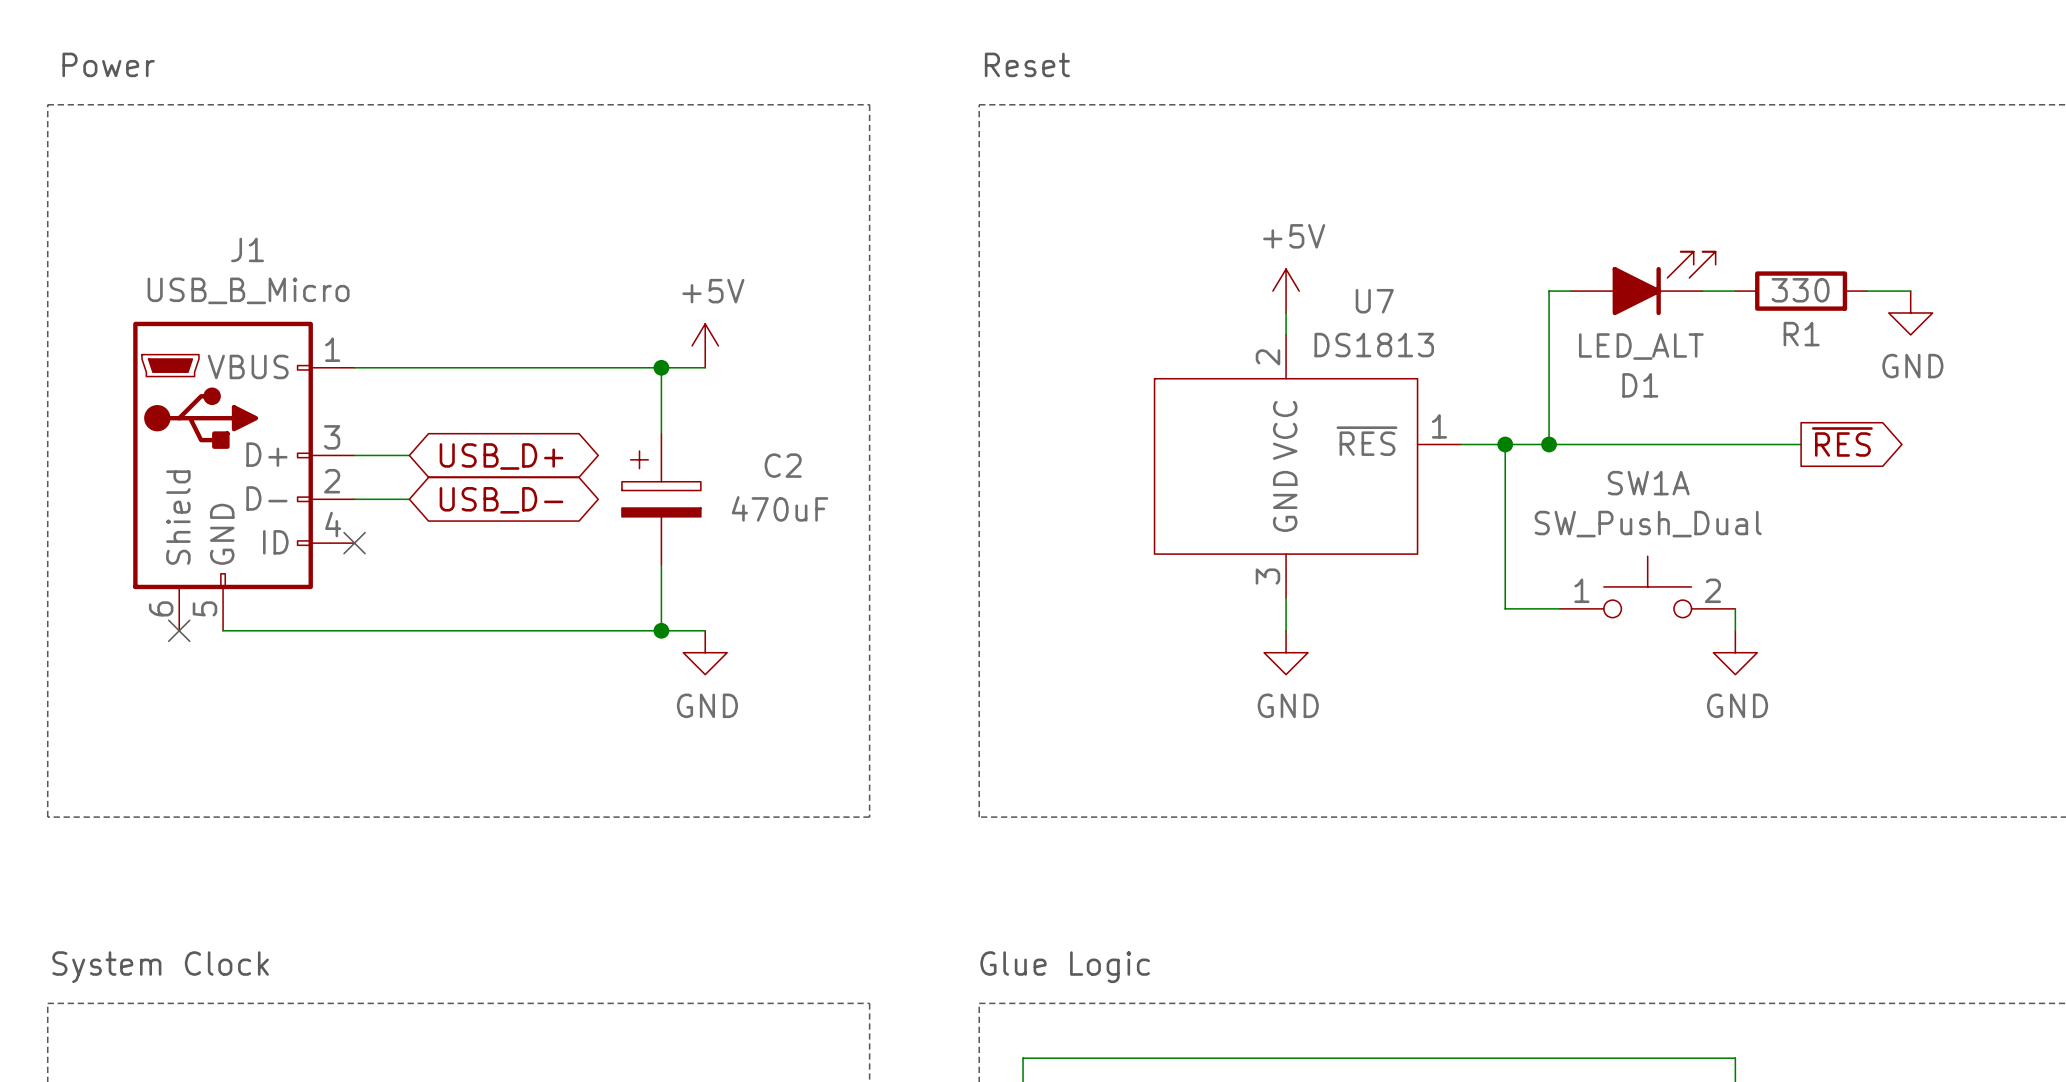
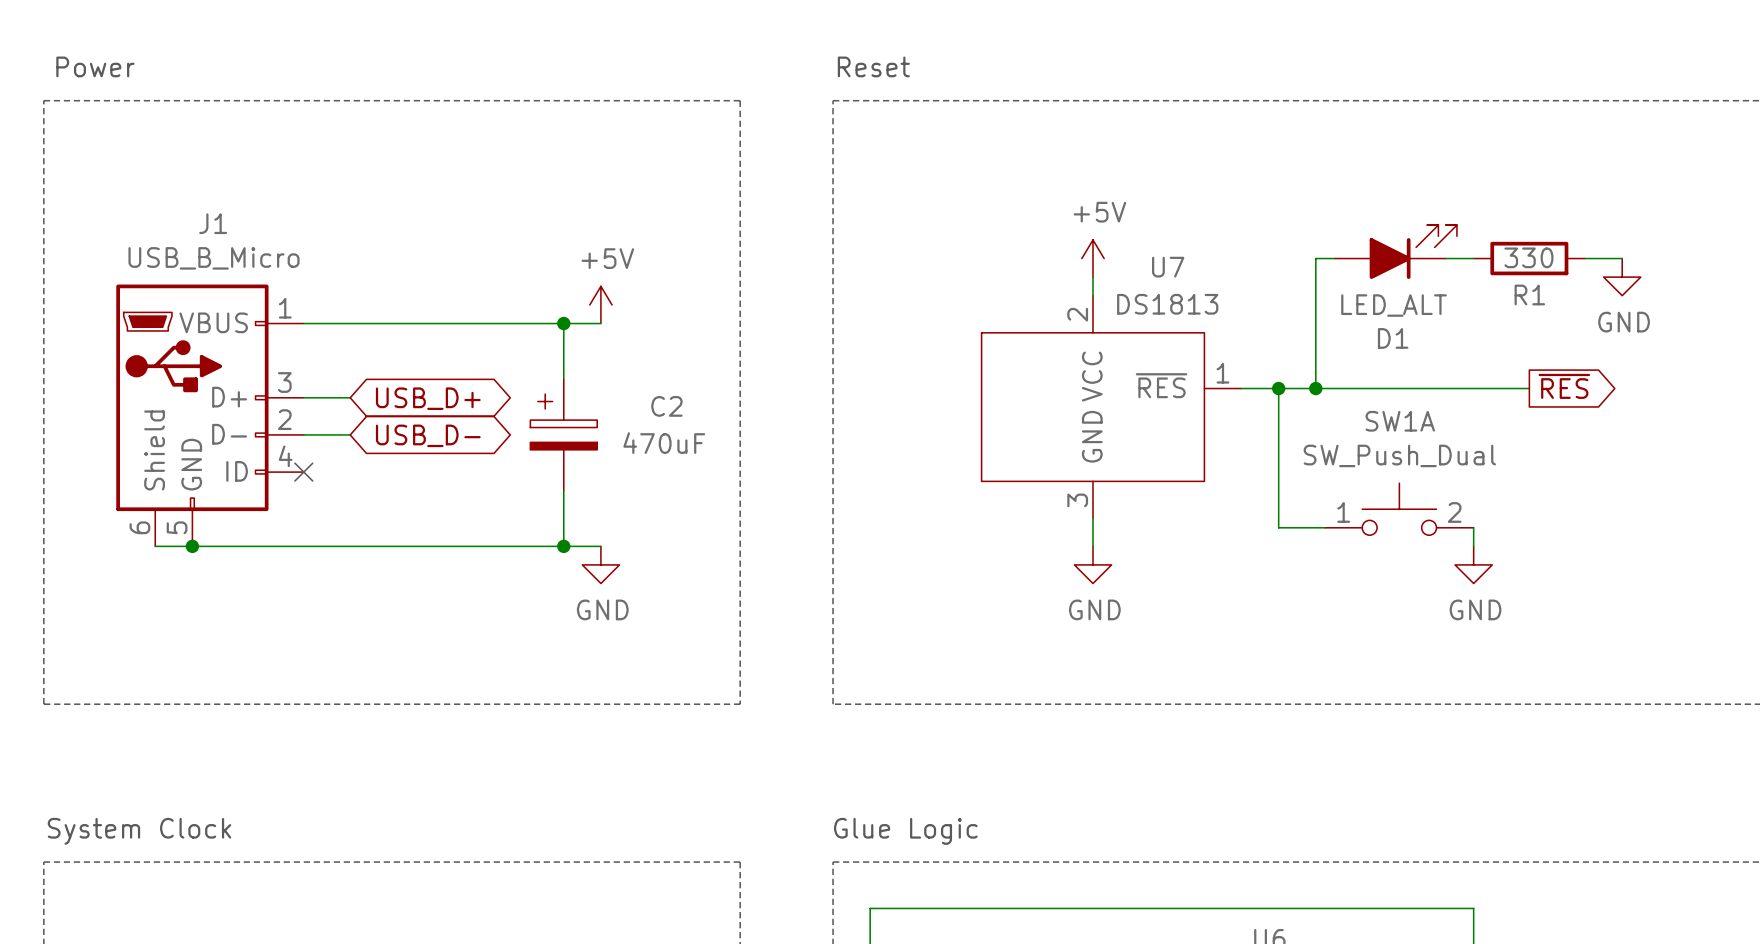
wire: none -> (155, 546) (192, 546)
no-connect mark: (179, 630) -> none
junction: none -> (192, 546)

